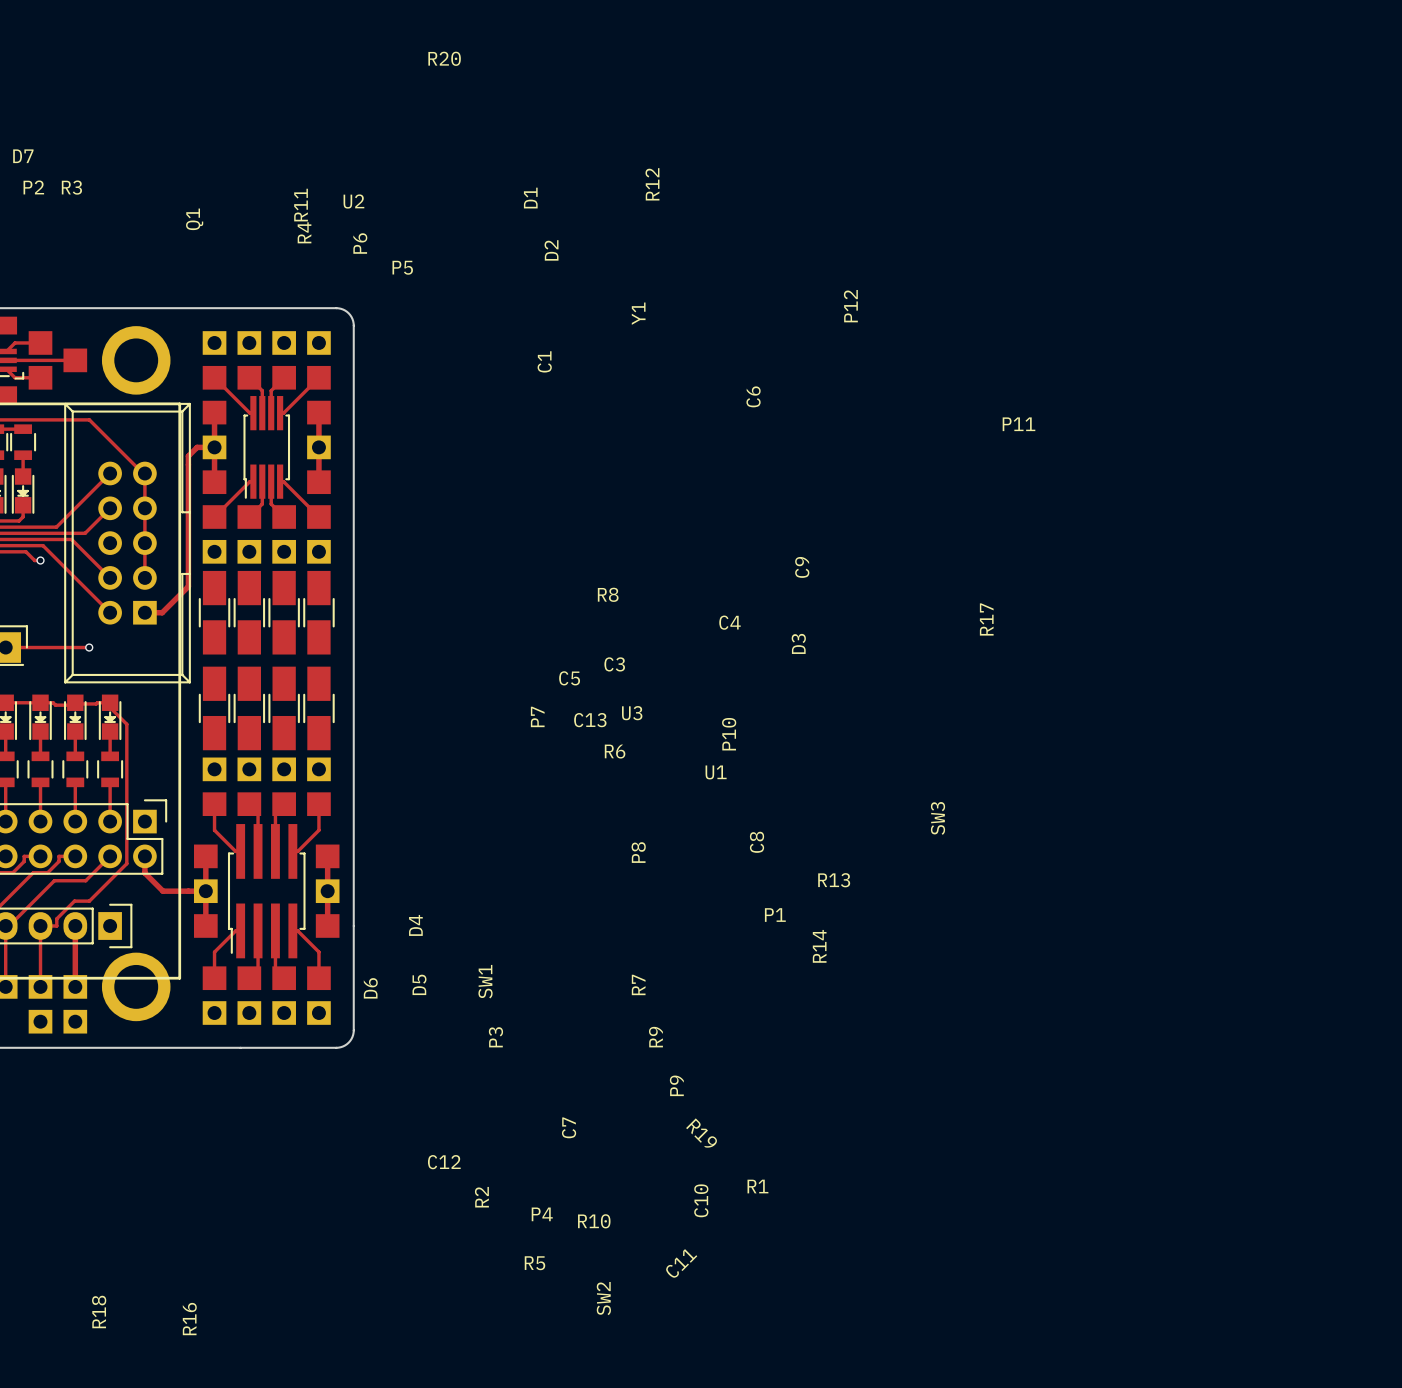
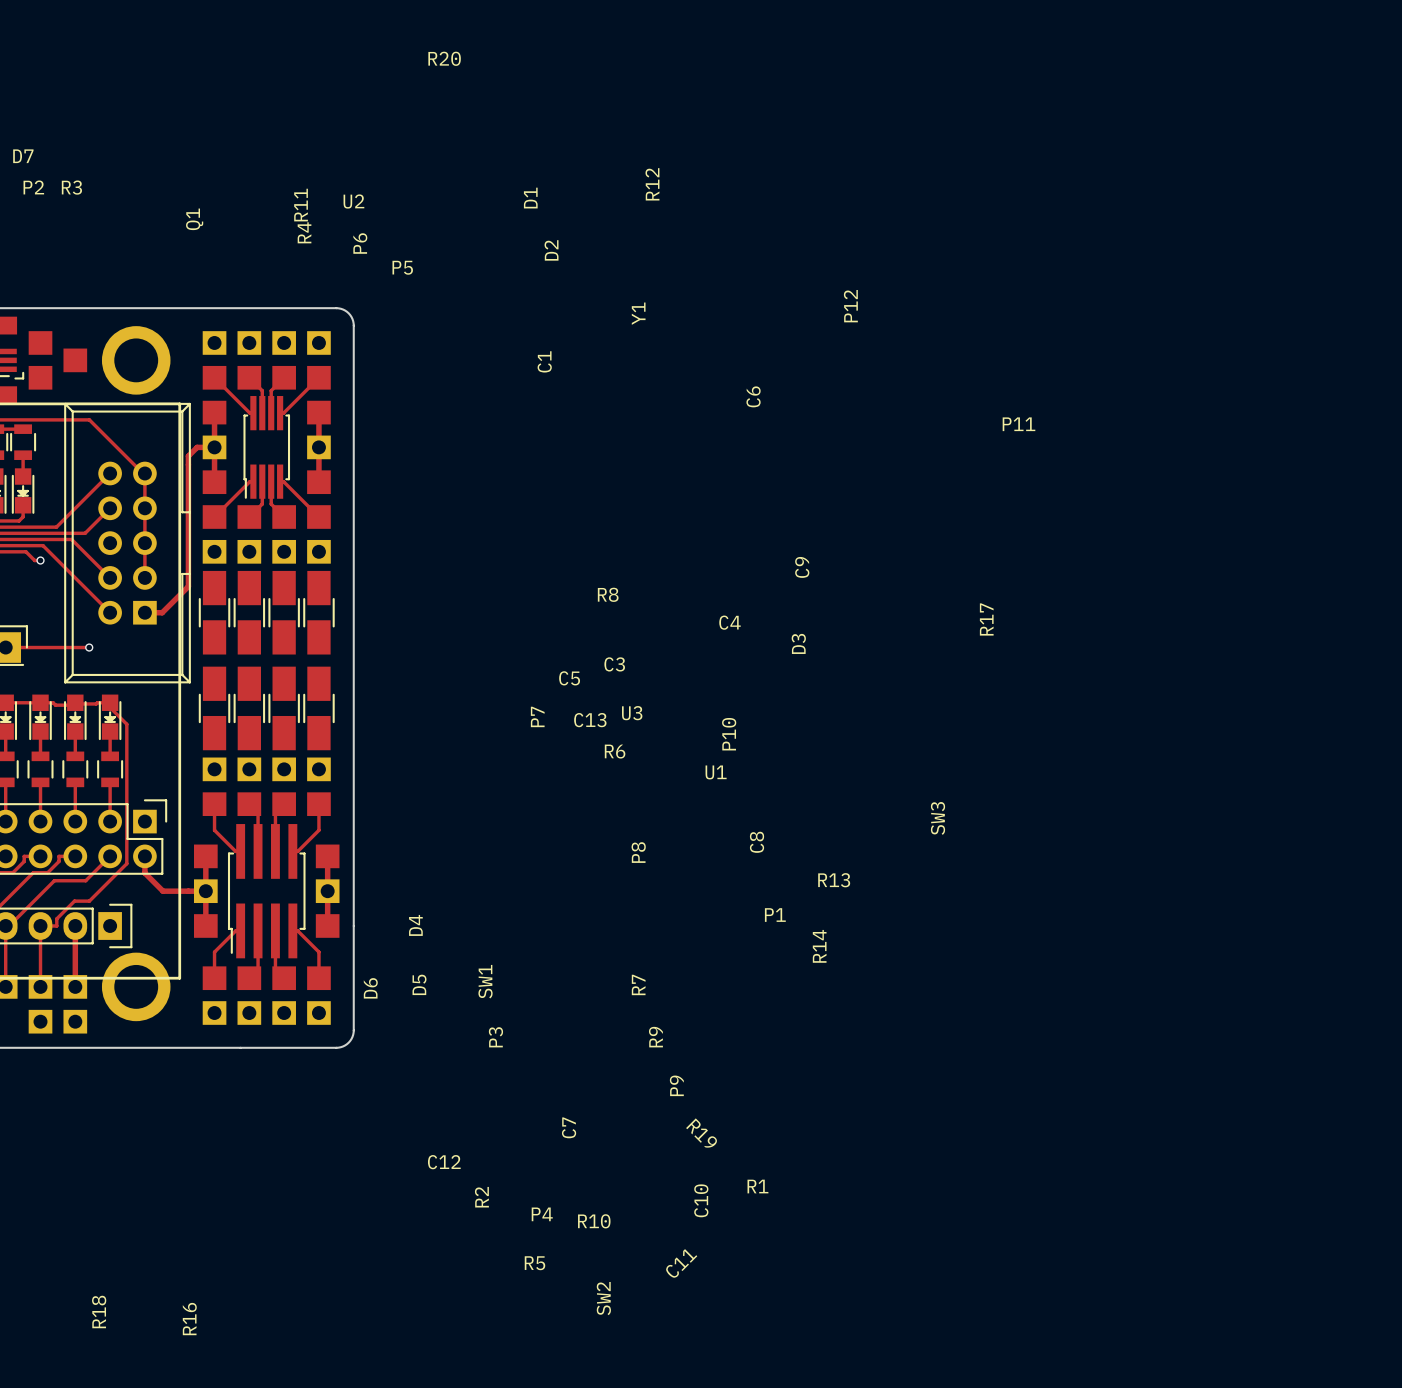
track: (40, 342) (15, 342) (6, 351) -> none
track: (6, 360) (75, 360) -> none
track: (6, 369) (15, 377) (40, 377) -> none

